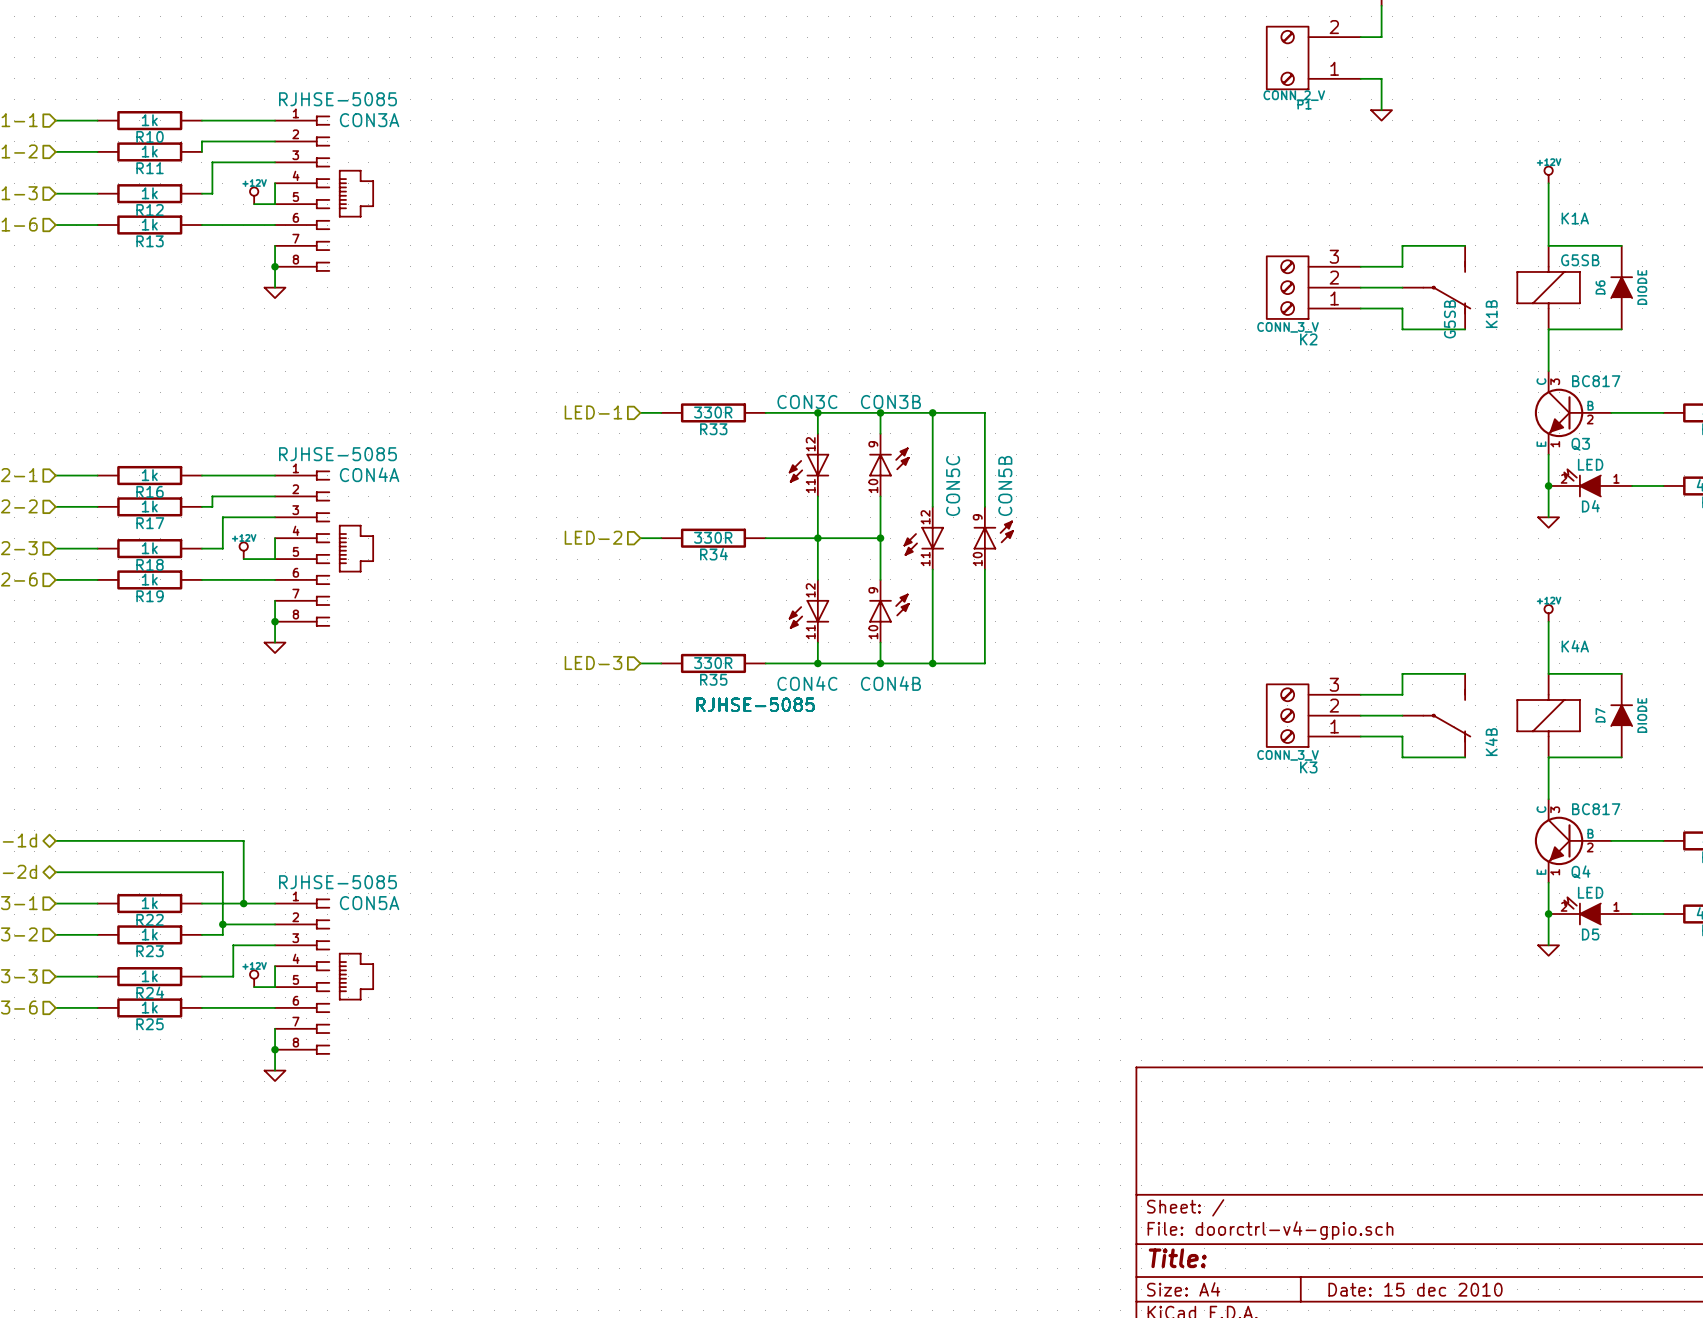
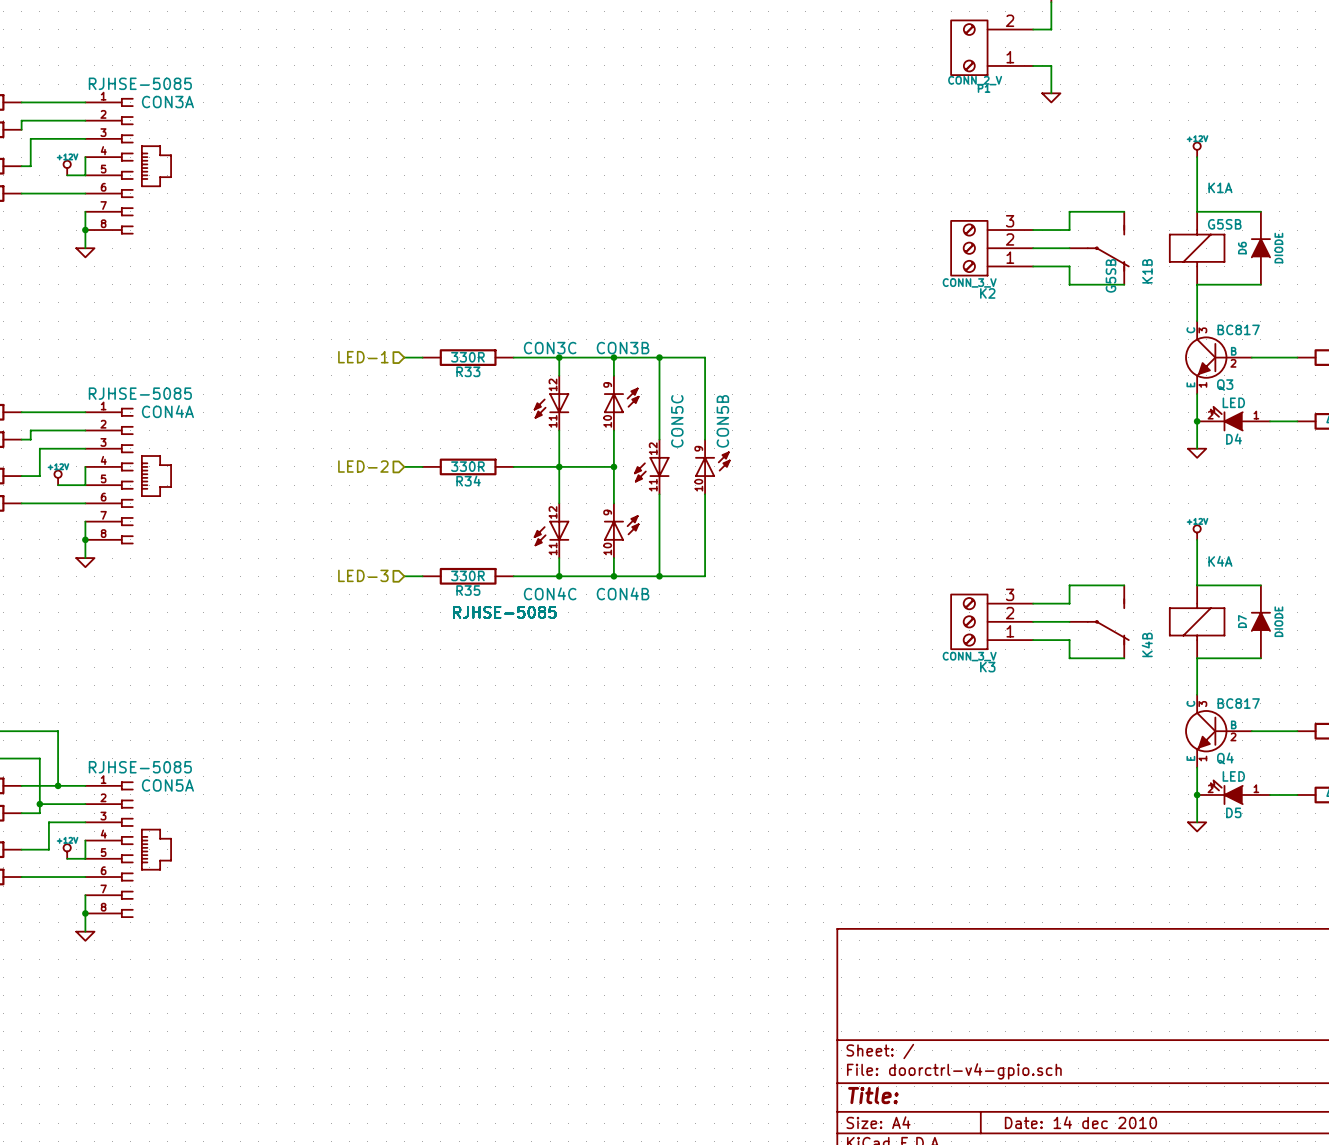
title block: Date: 15 dec 2010 (1415, 1289) -> Date: 14 dec 2010 (1080, 1122)

